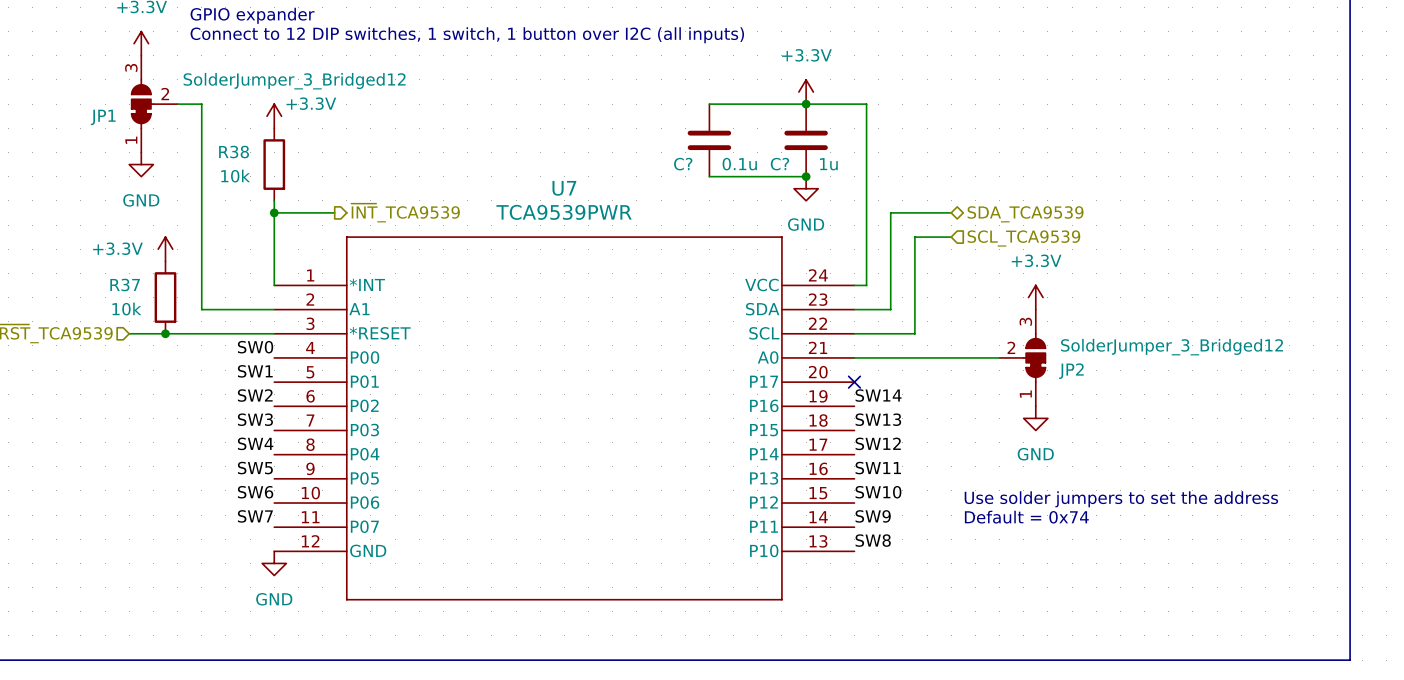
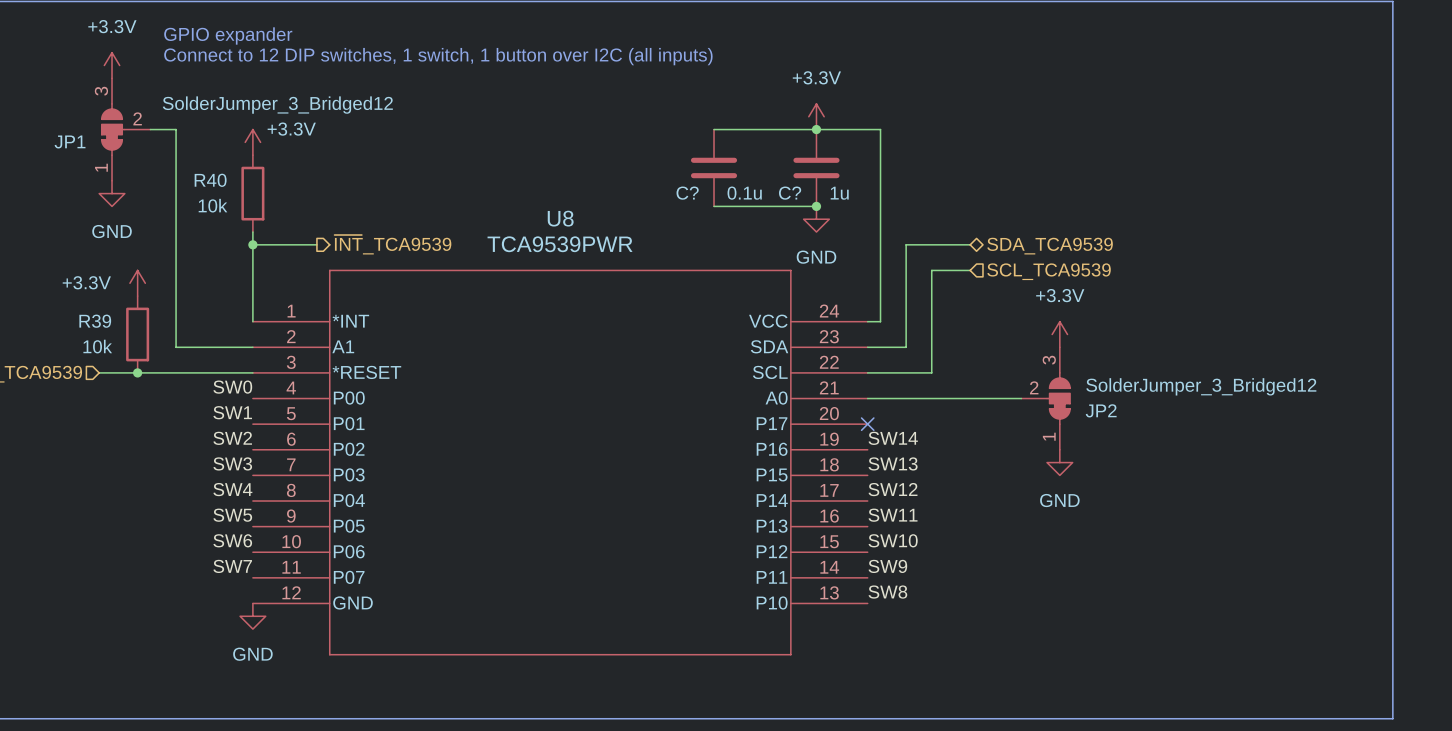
R38 name: R38 (234, 152) -> R40 (210, 180)
U7 name: U7 (564, 188) -> U8 (560, 218)
R37 name: R37 (125, 284) -> R39 (95, 321)
text: Use solder jumpers to set the address (1121, 499) -> none
text: Default = 0x74 (1026, 517) -> none

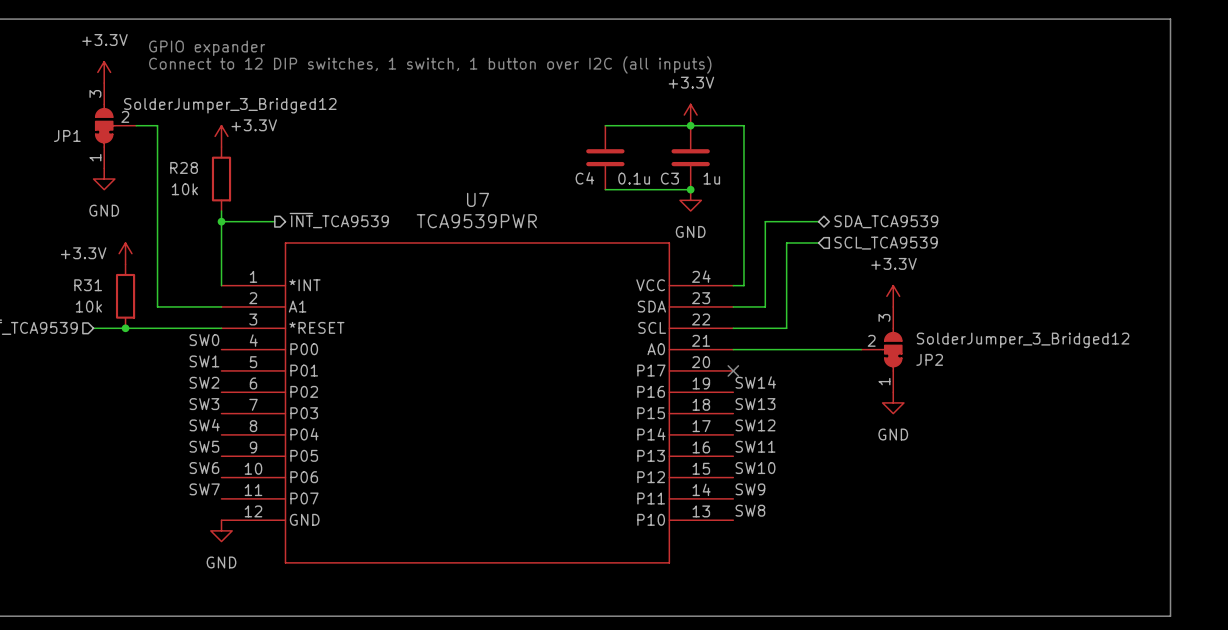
R40 name: R40 (210, 180) -> R28 (184, 167)
C? name: C? (687, 193) -> C4 (584, 178)
C? name: C? (790, 193) -> C3 (669, 178)
U8 name: U8 (560, 218) -> U7 (478, 199)
R39 name: R39 (95, 321) -> R31 (88, 285)

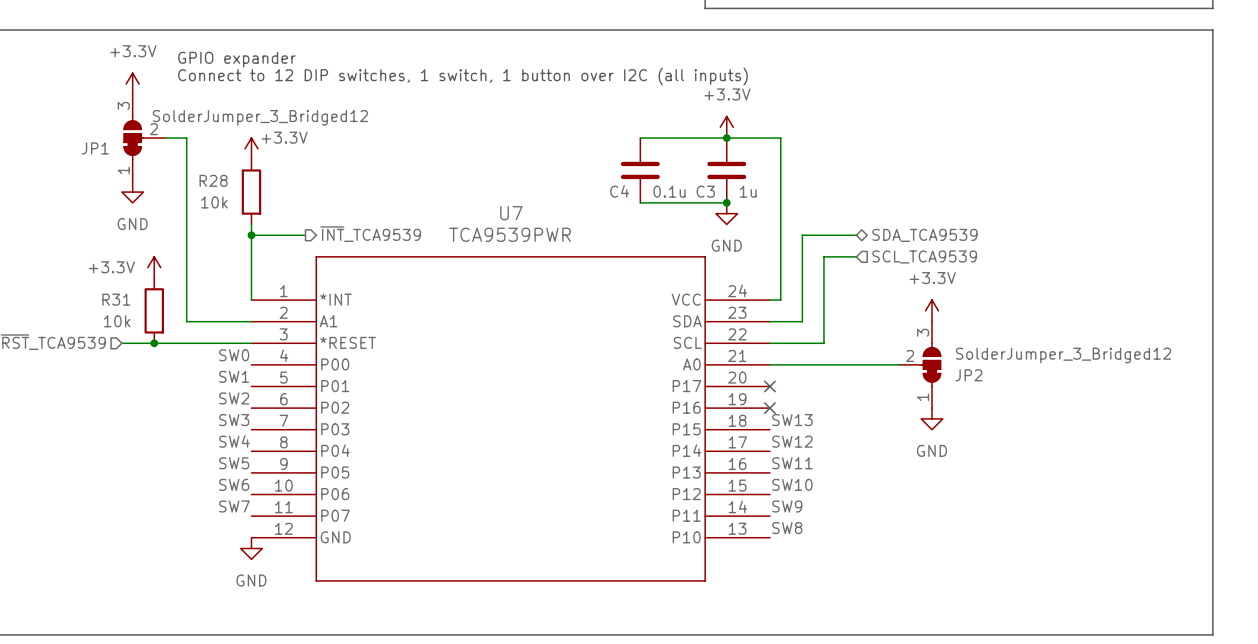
label: SW14 (755, 382) -> none
no-connect mark: none -> (769, 408)

